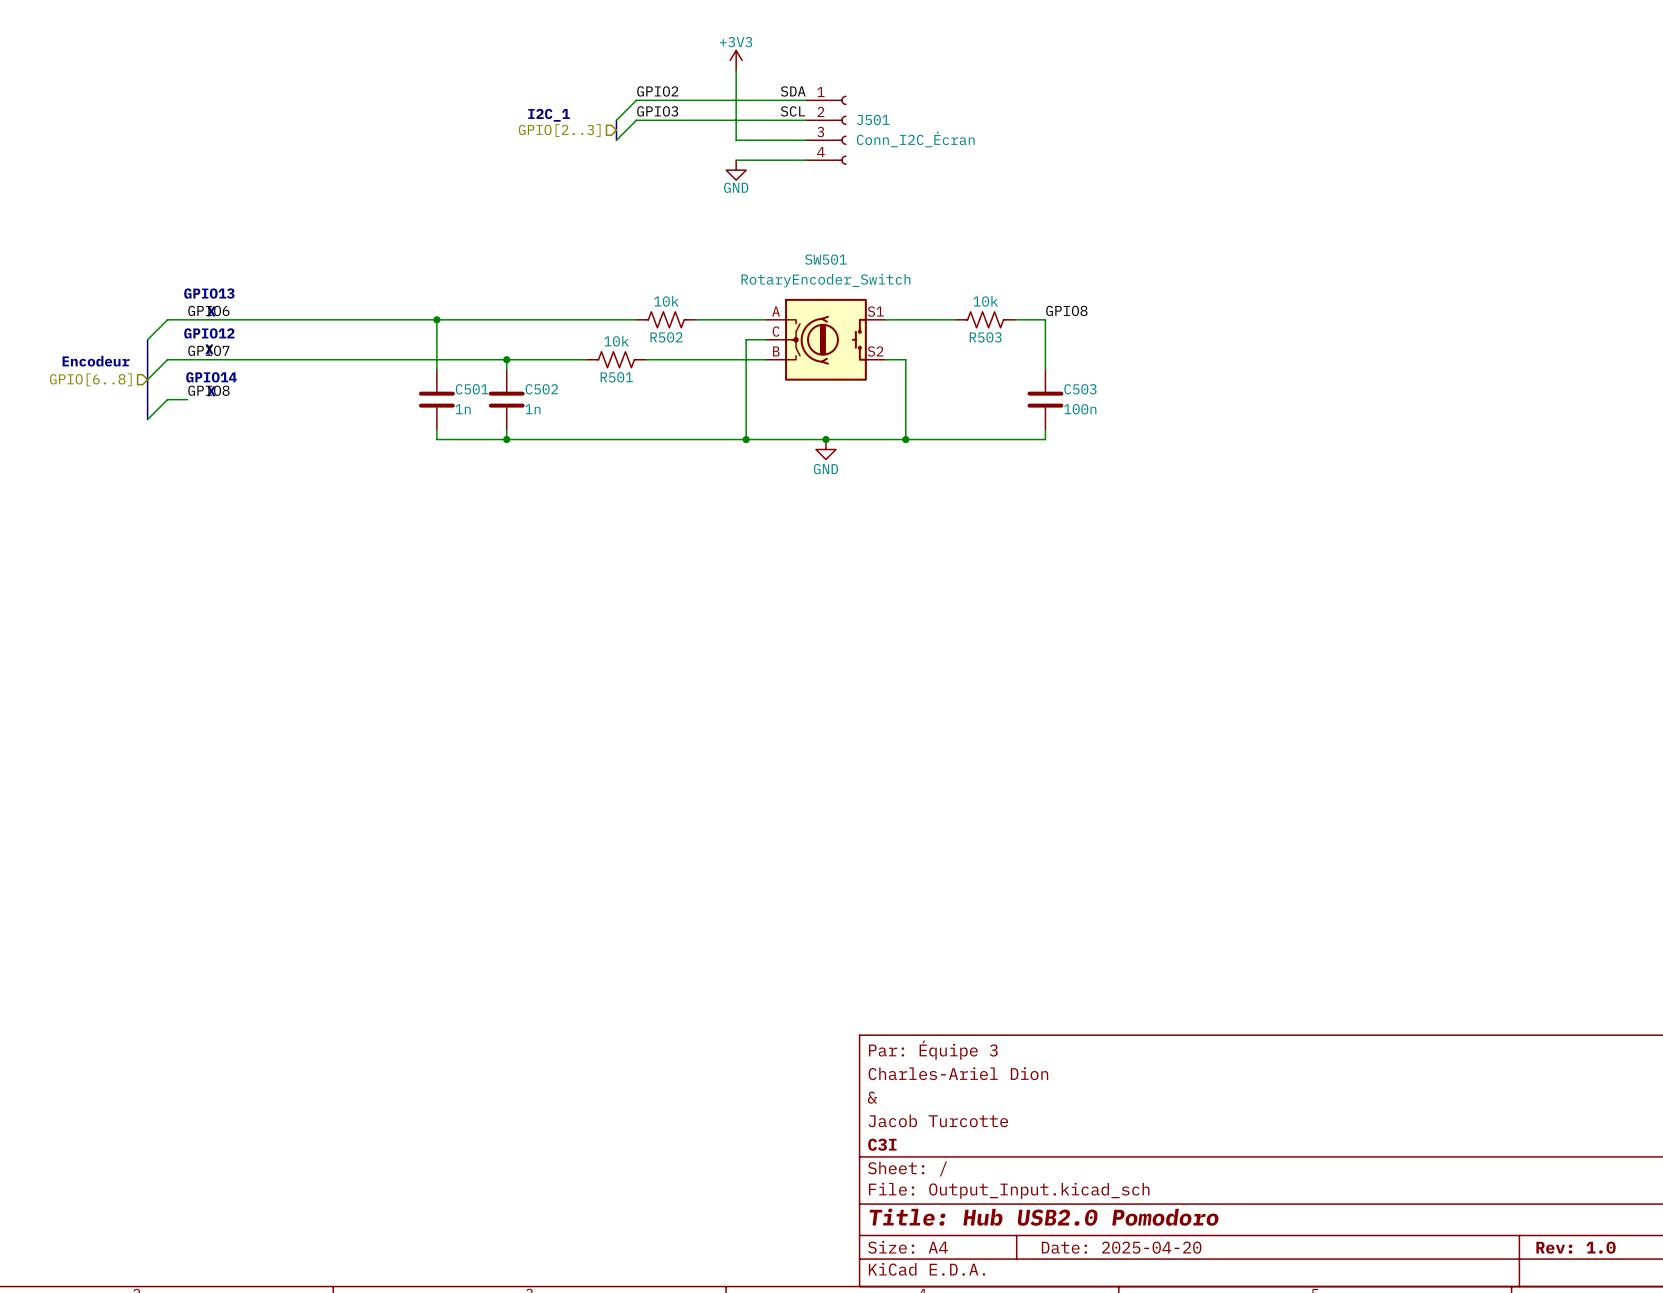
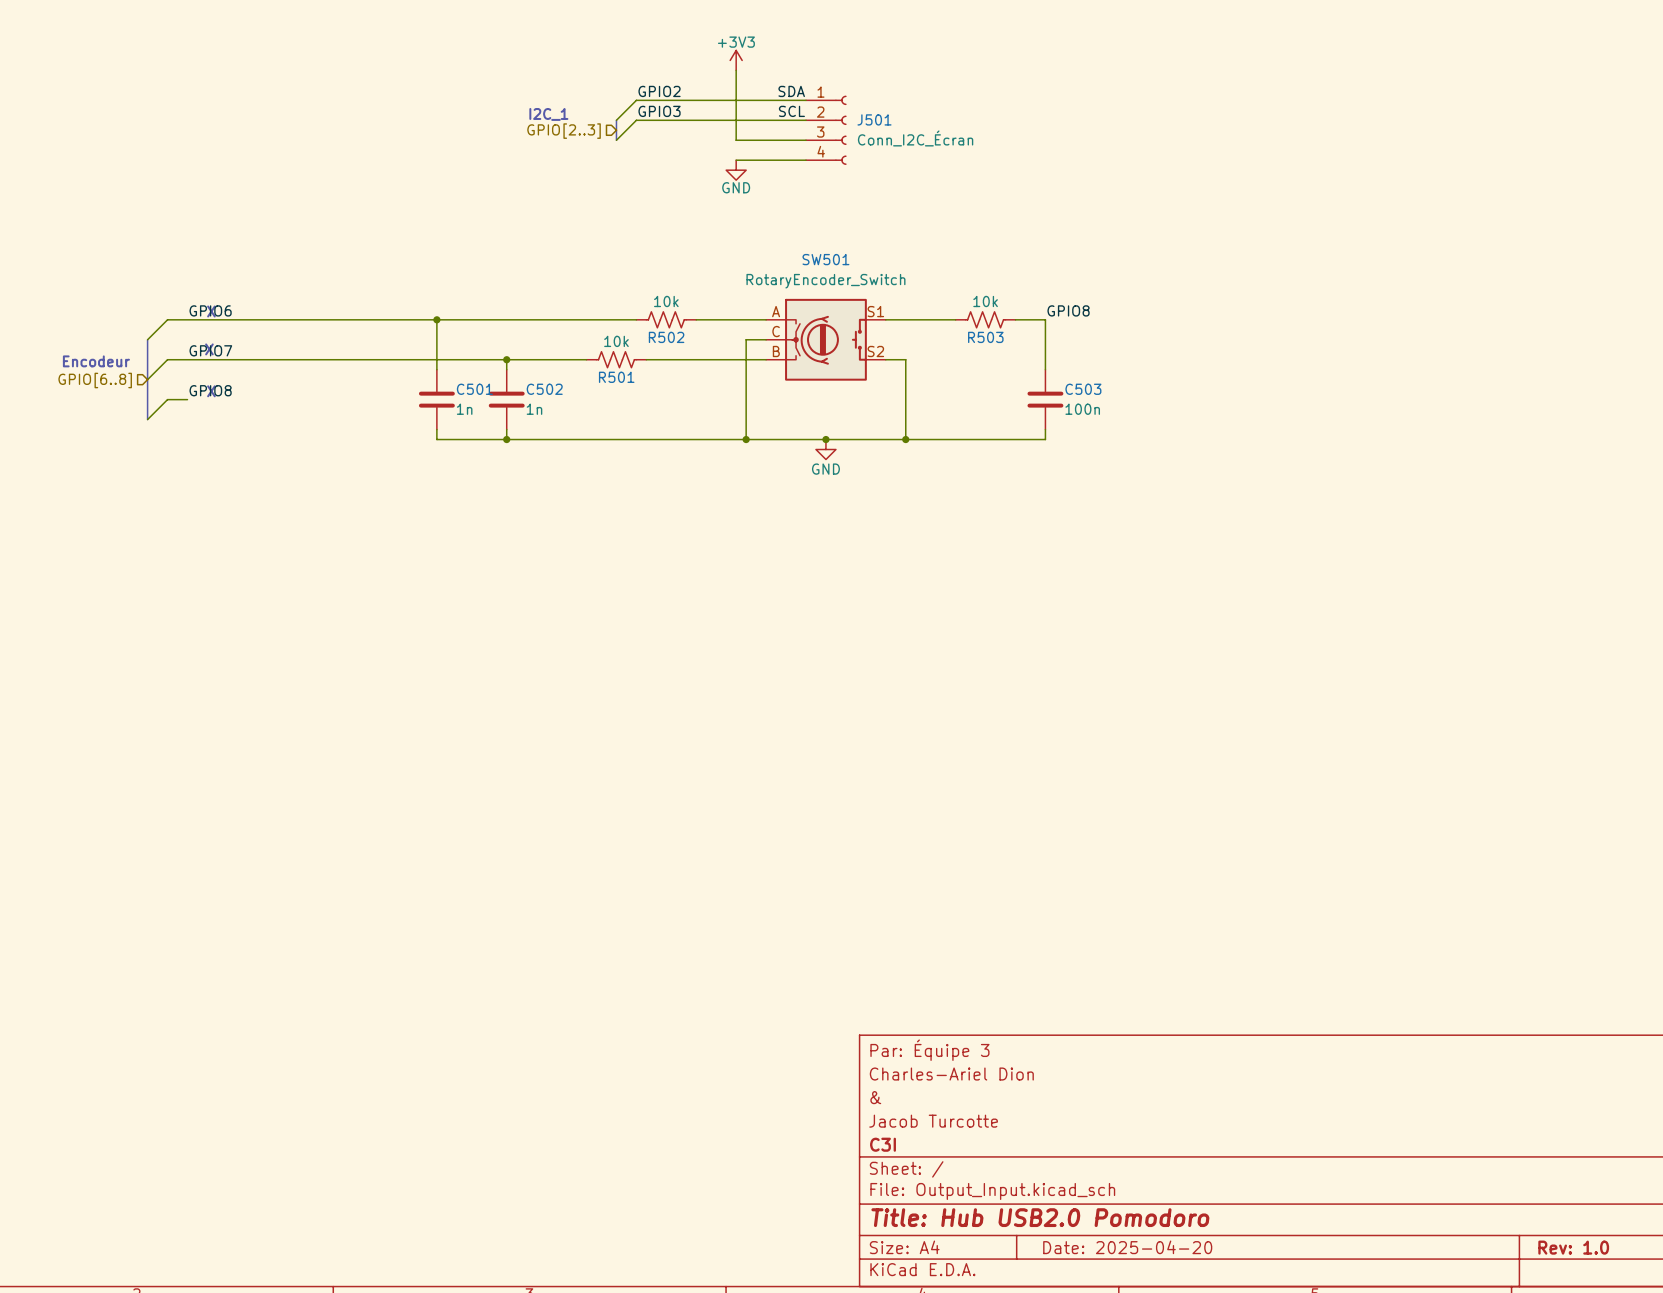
text: GPIO13 (209, 293) -> none
text: GPIO12 (209, 333) -> none
text: GPIO14 (211, 377) -> none

